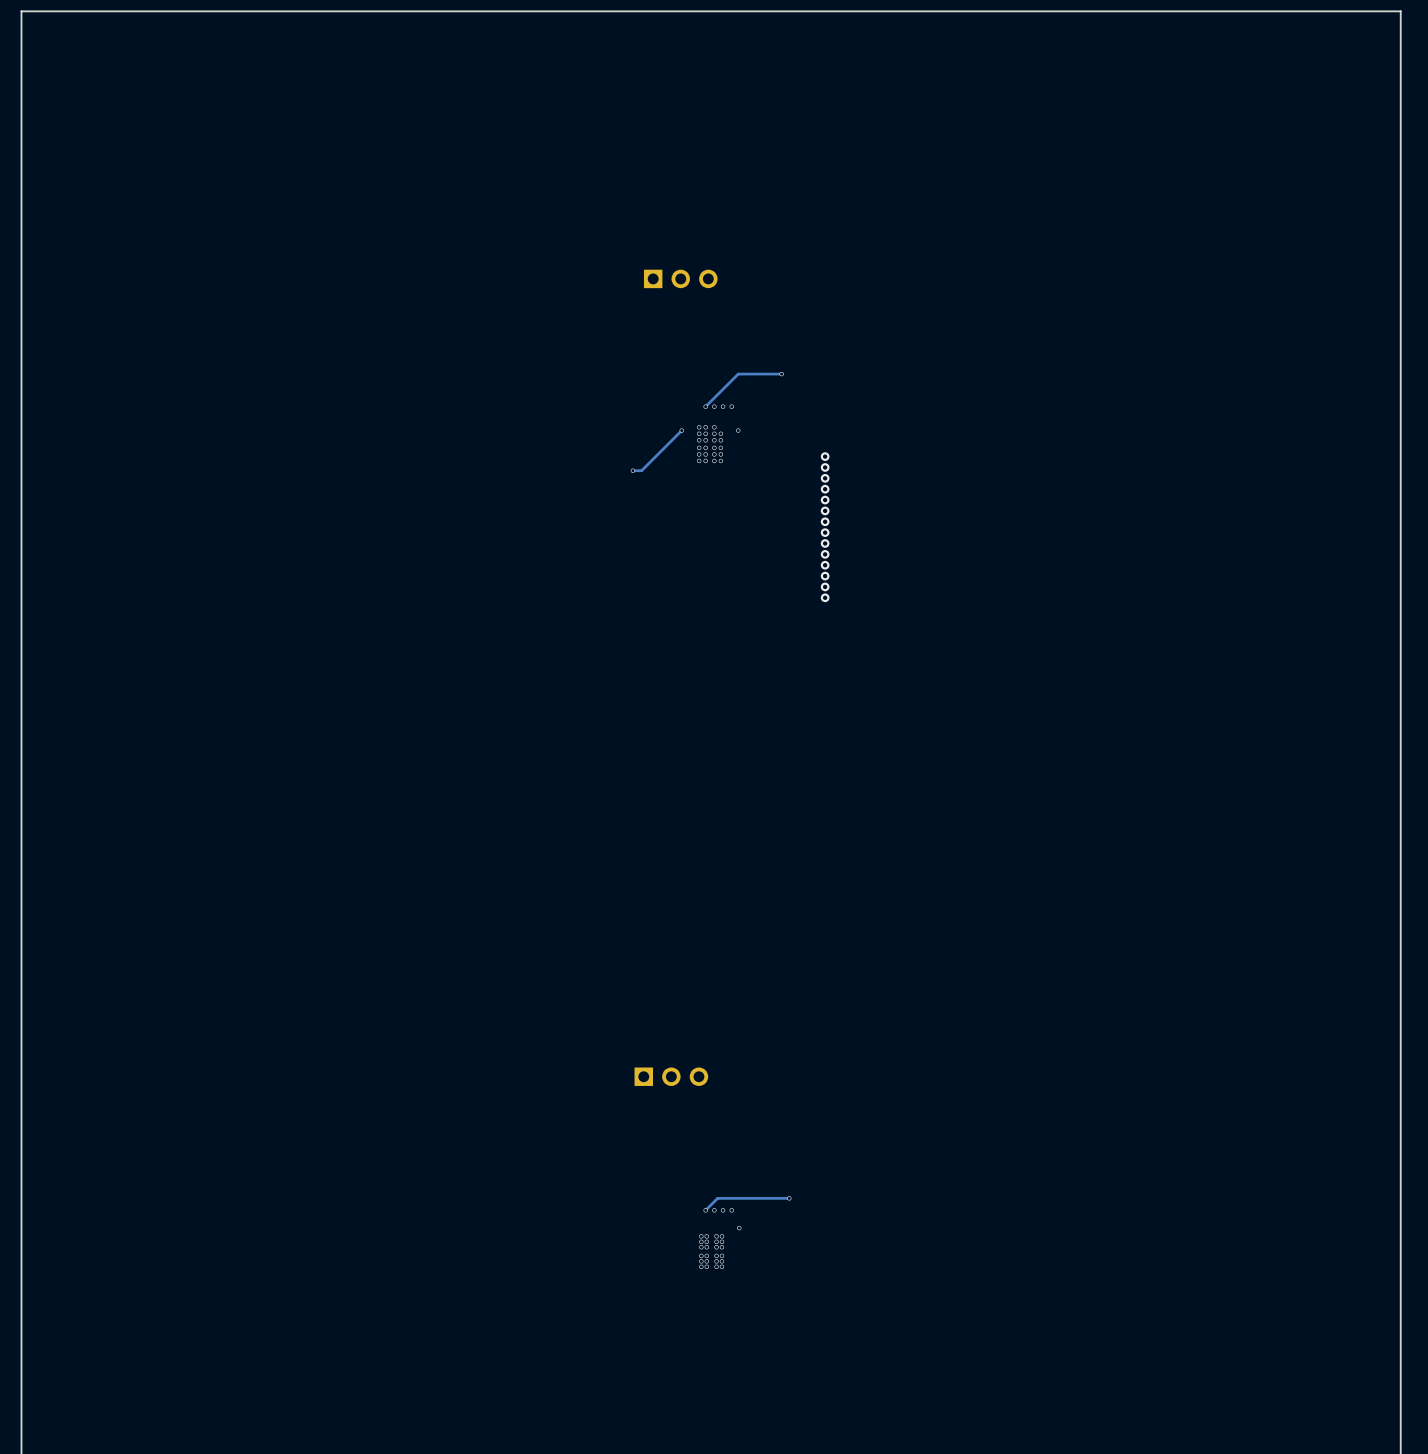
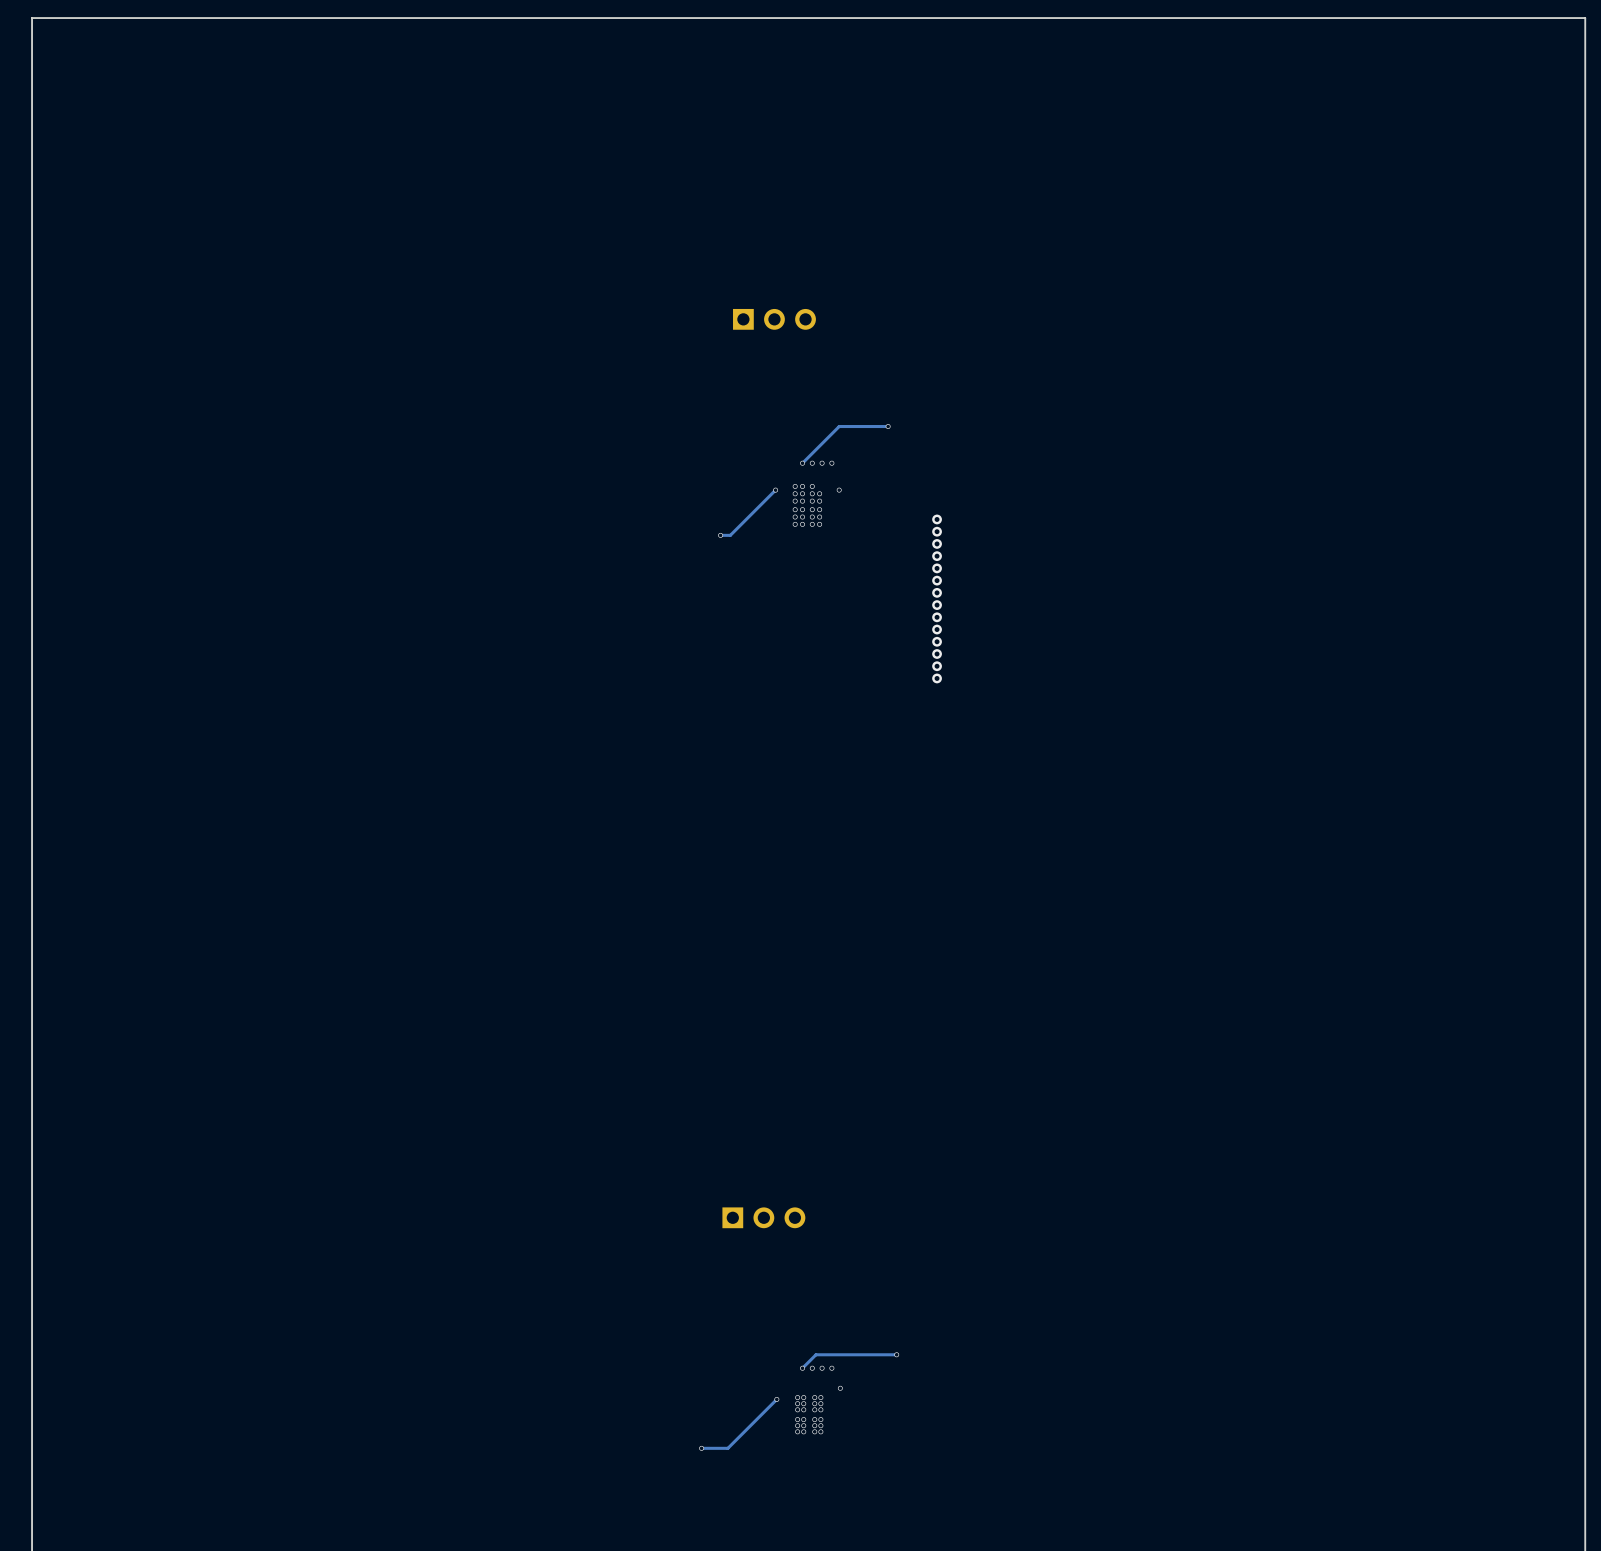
track: none -> (776, 1399) (727, 1448) (701, 1448)
via: none -> (776, 1399)
via: none -> (701, 1448)

